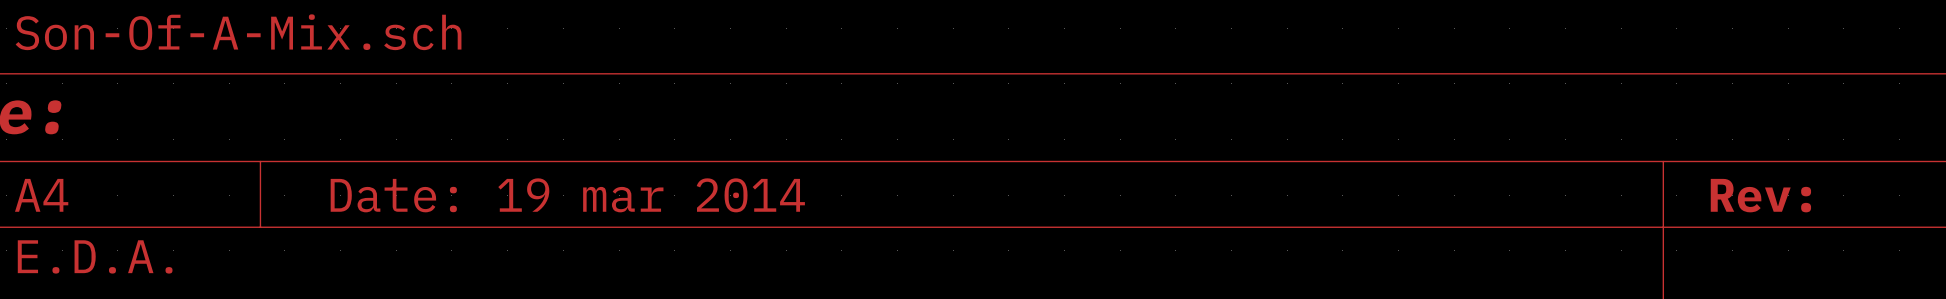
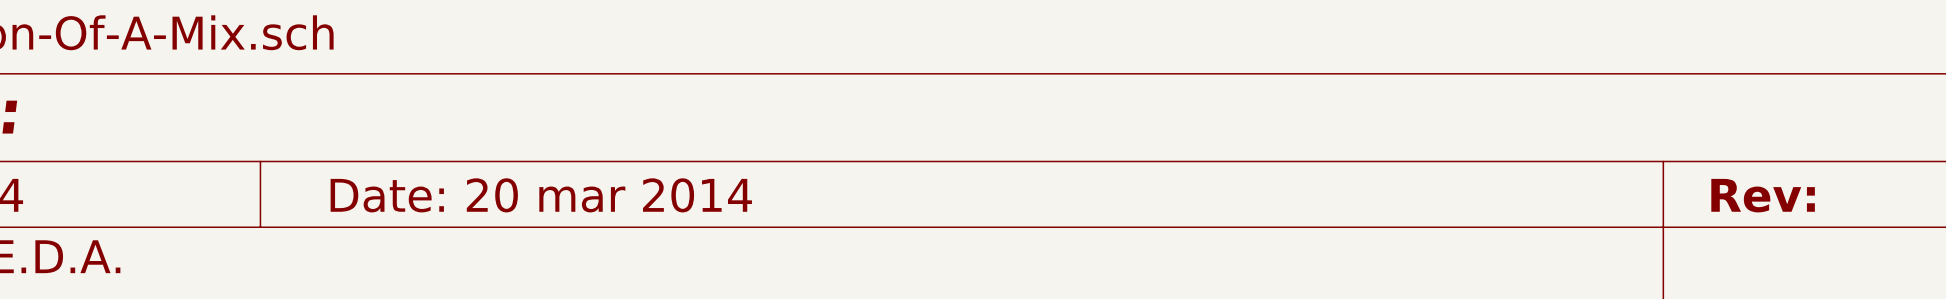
title block: Date: 19 mar 2014 (567, 195) -> Date: 20 mar 2014 (541, 195)

